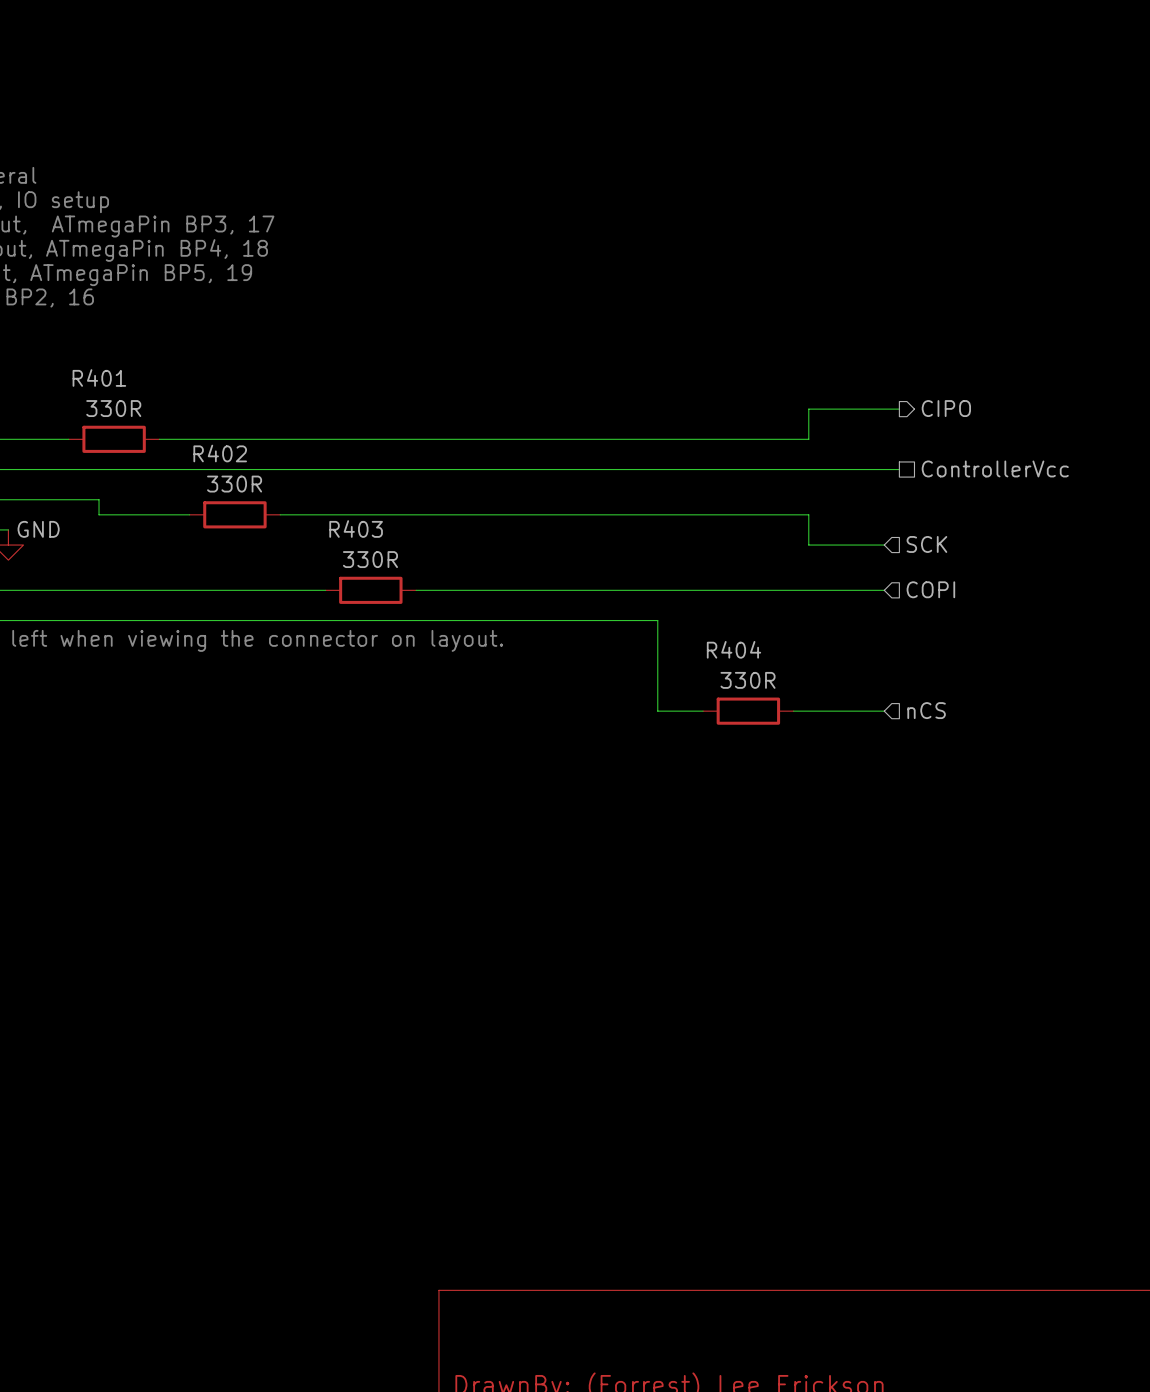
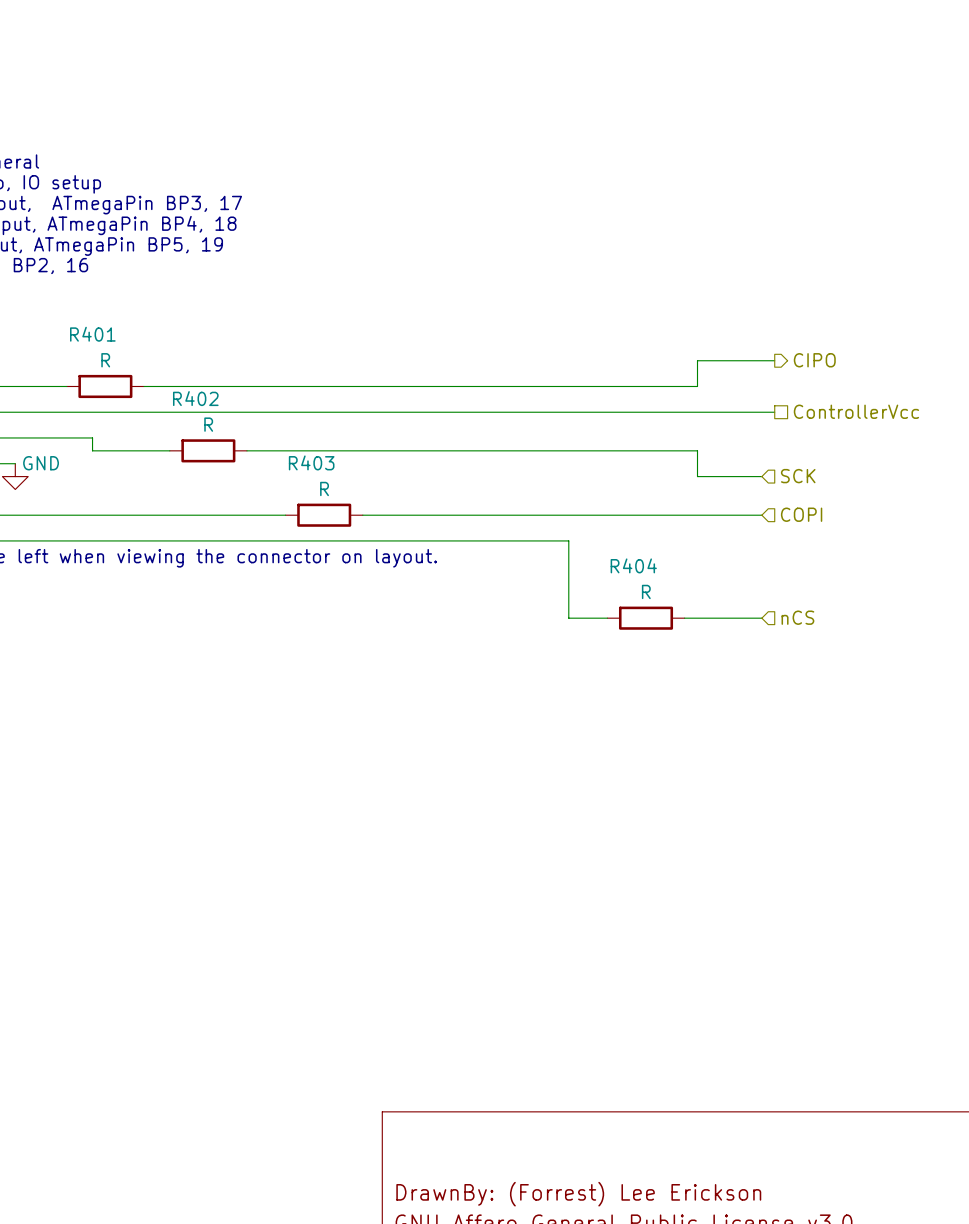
R401 value: 330R (113, 408) -> R (105, 360)
R402 value: 330R (234, 484) -> R (208, 424)
R403 value: 330R (370, 559) -> R (324, 488)
R404 value: 330R (748, 680) -> R (646, 591)

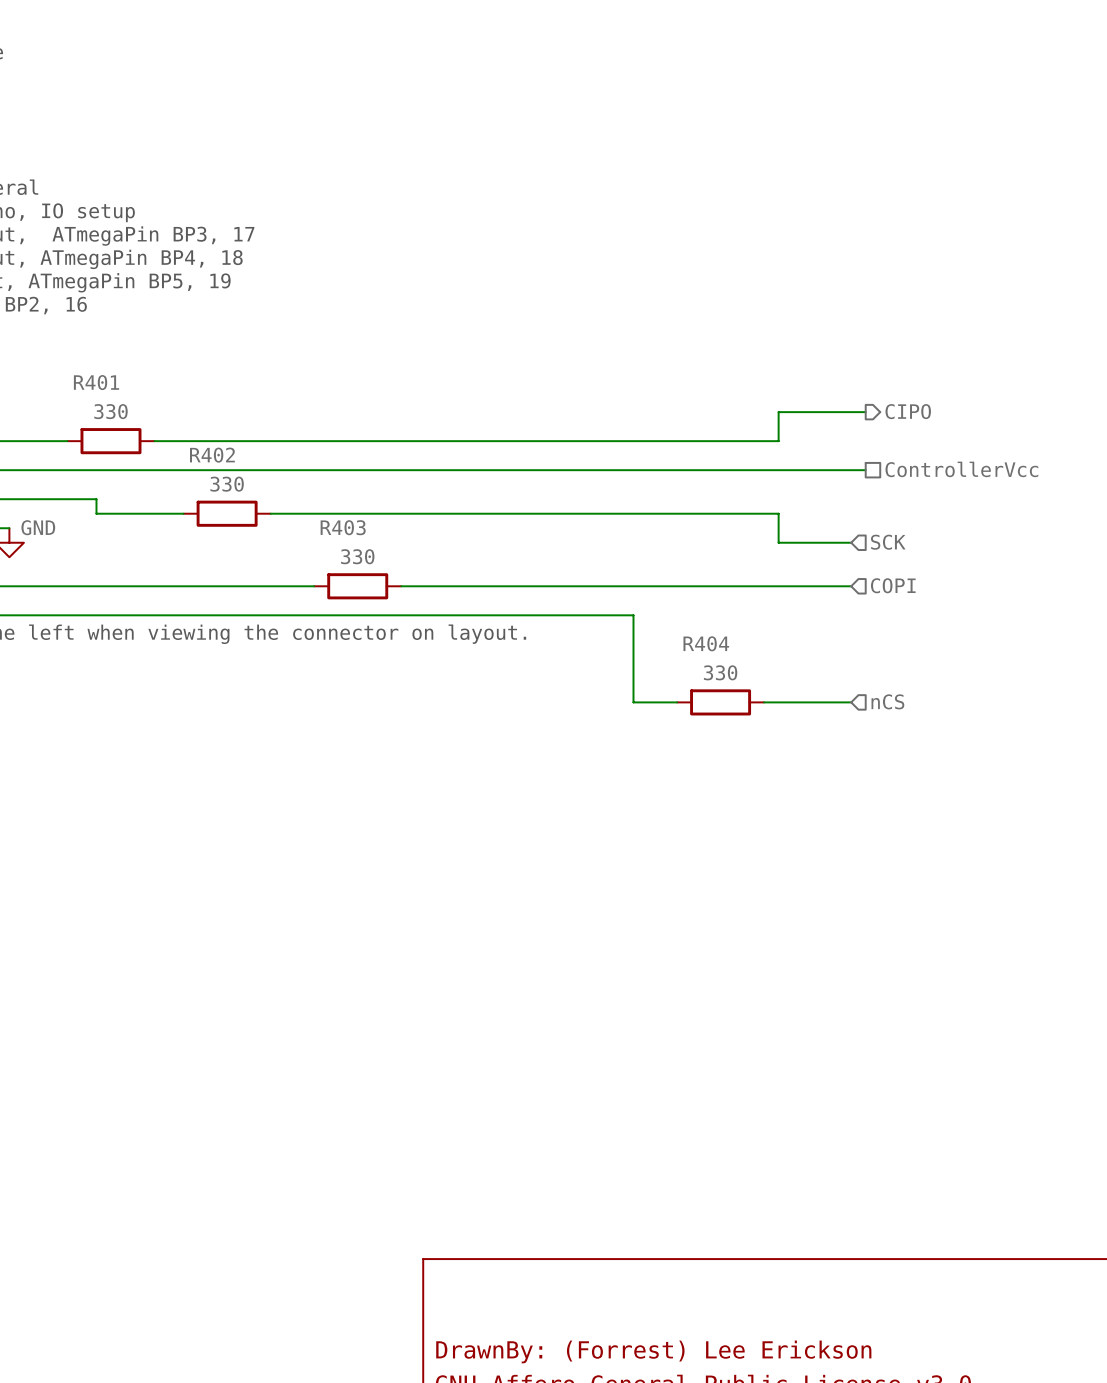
R401 value: R (105, 360) -> 330 (111, 411)
R402 value: R (208, 424) -> 330 (227, 484)
R403 value: R (324, 488) -> 330 (357, 556)
R404 value: R (646, 591) -> 330 (720, 672)

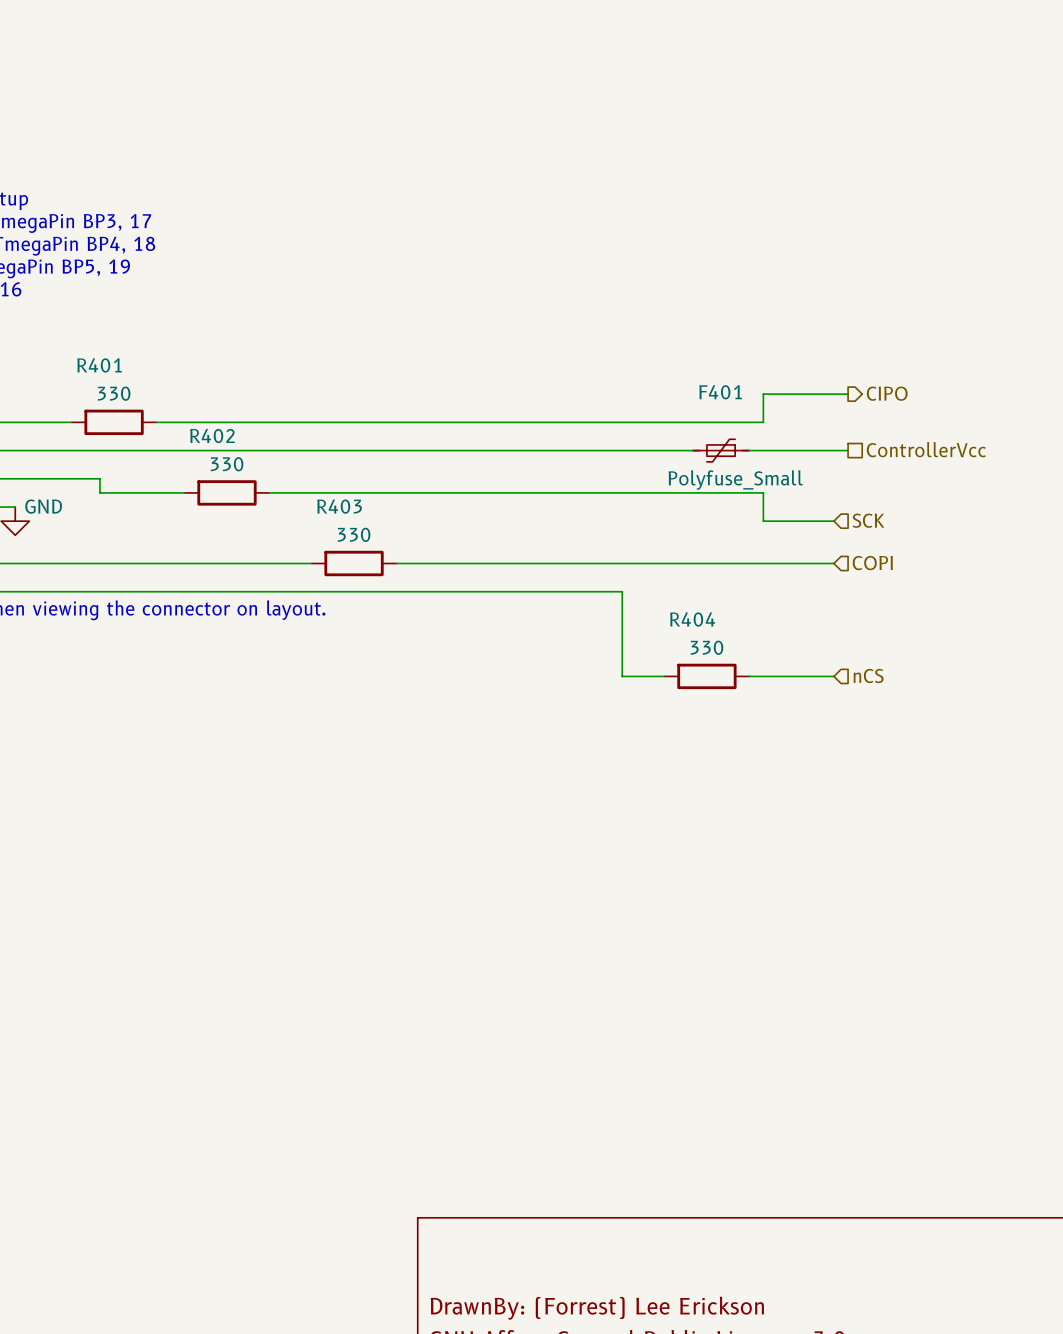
F401: none -> Polyfuse_Small (721, 450)

